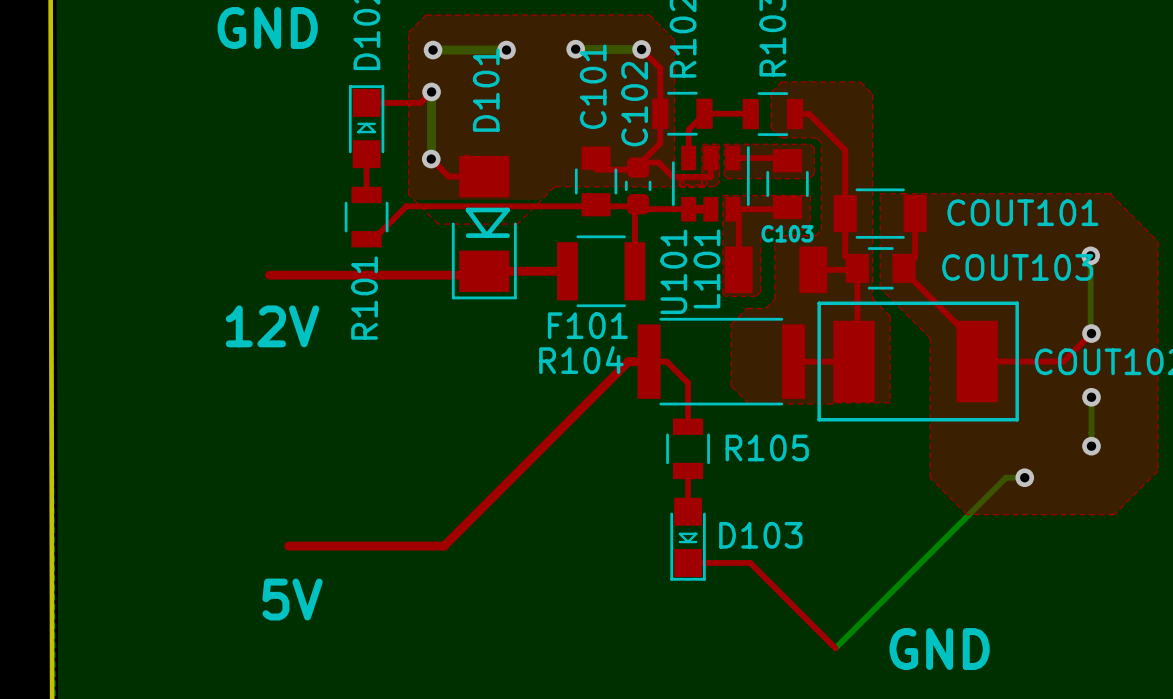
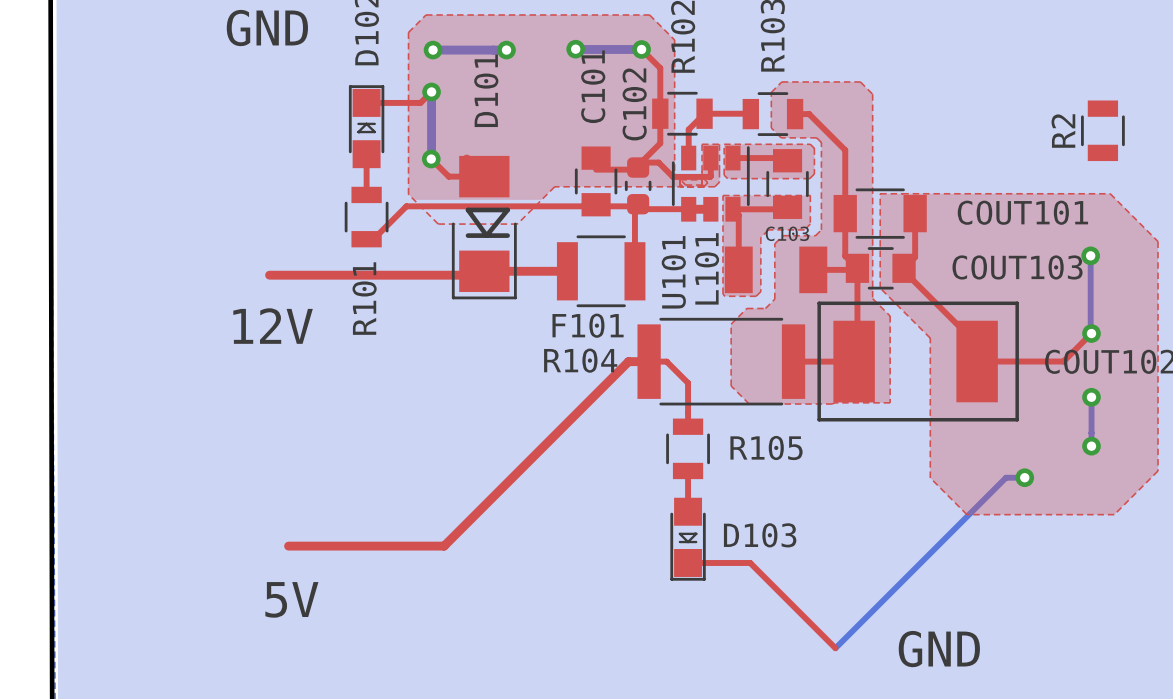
R2: none -> (1102, 130)

